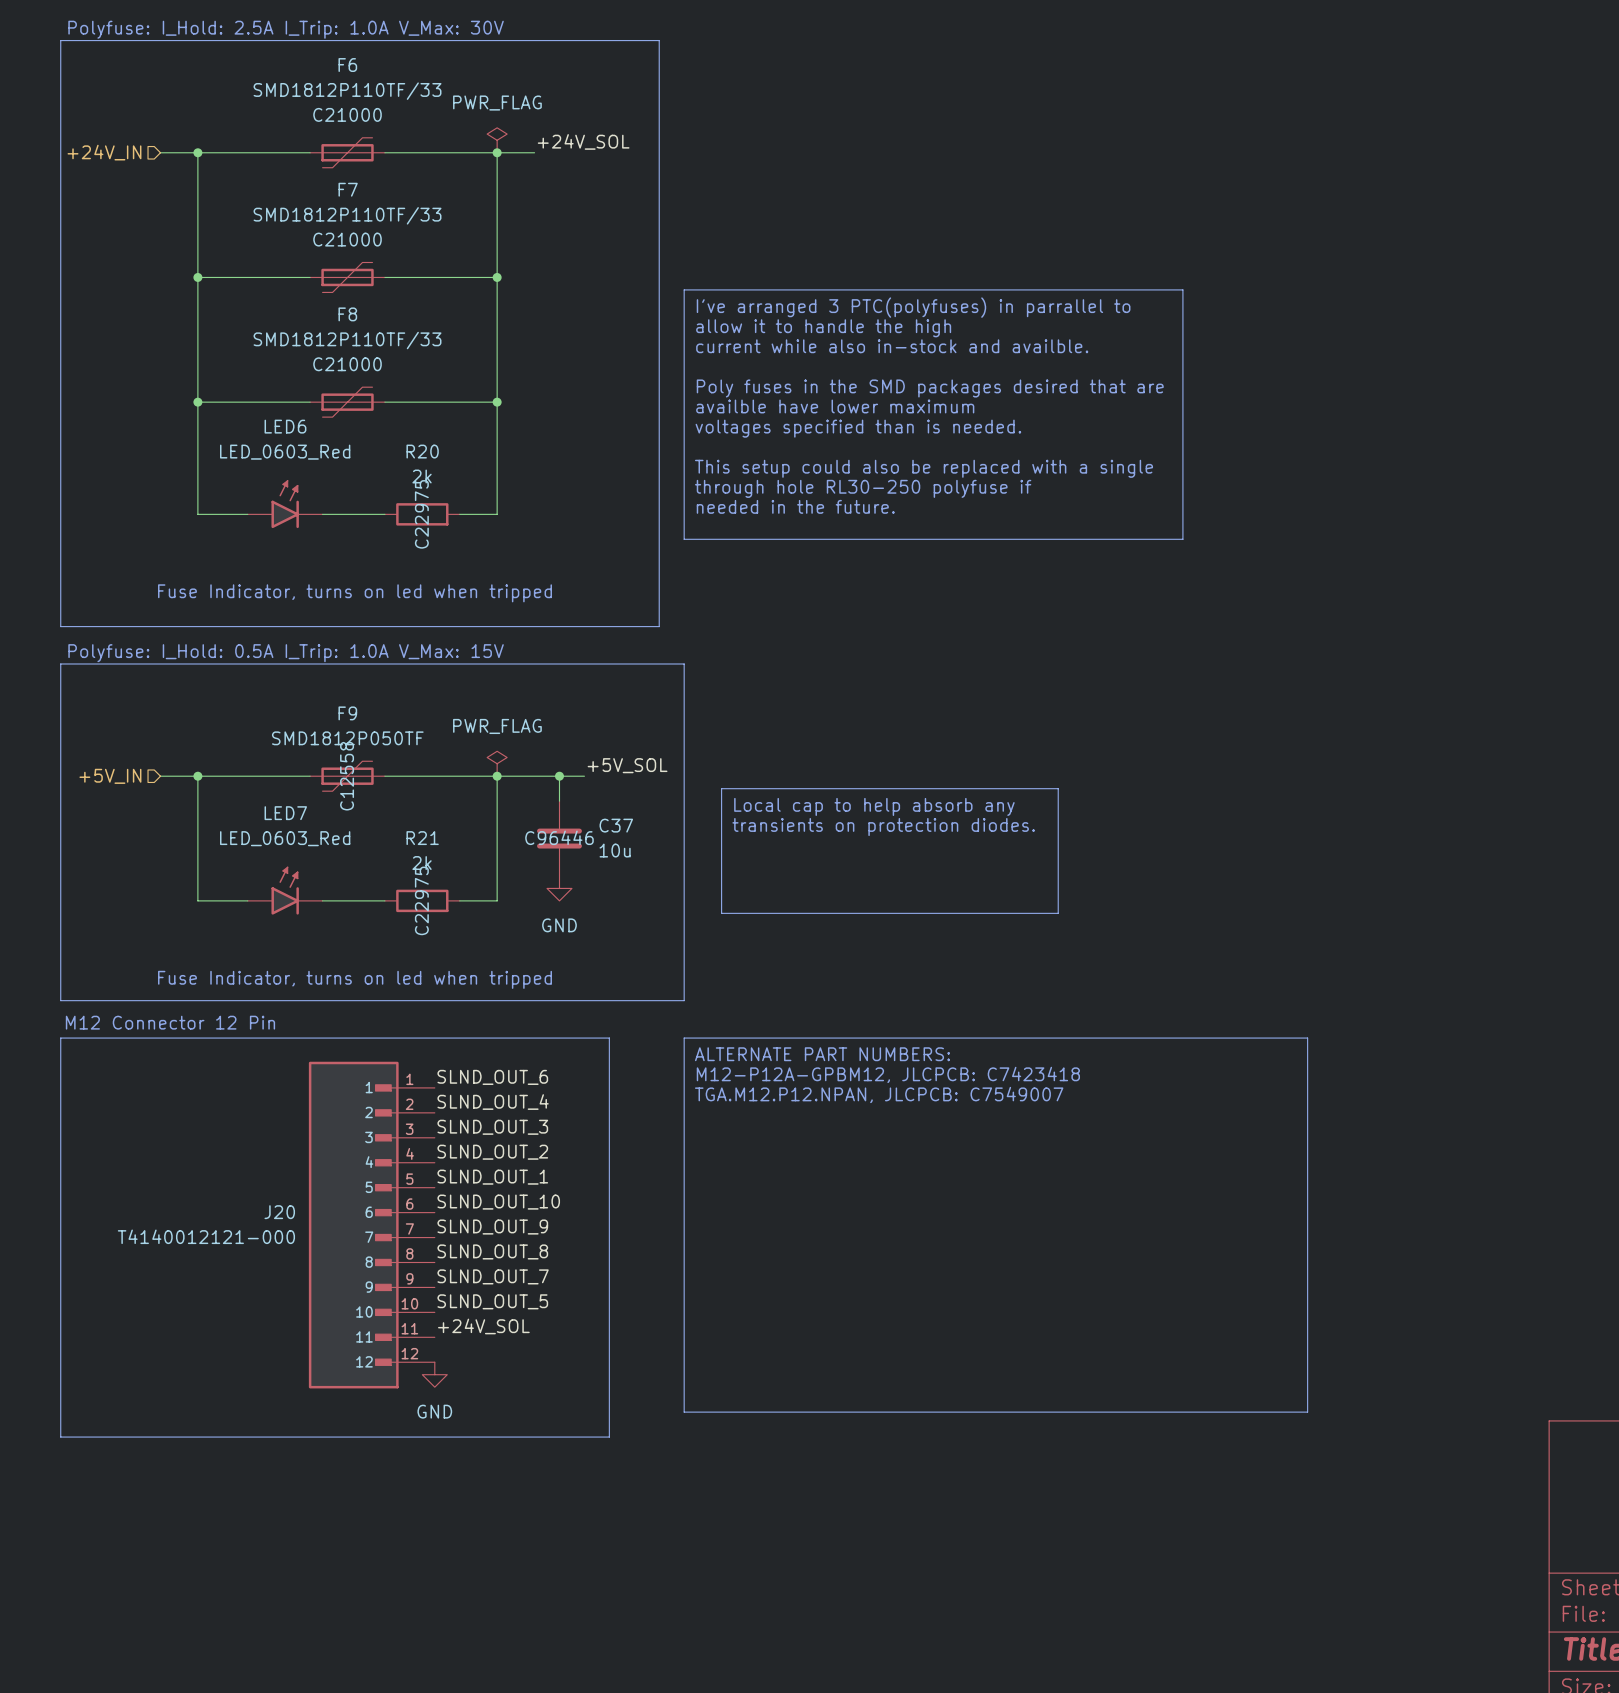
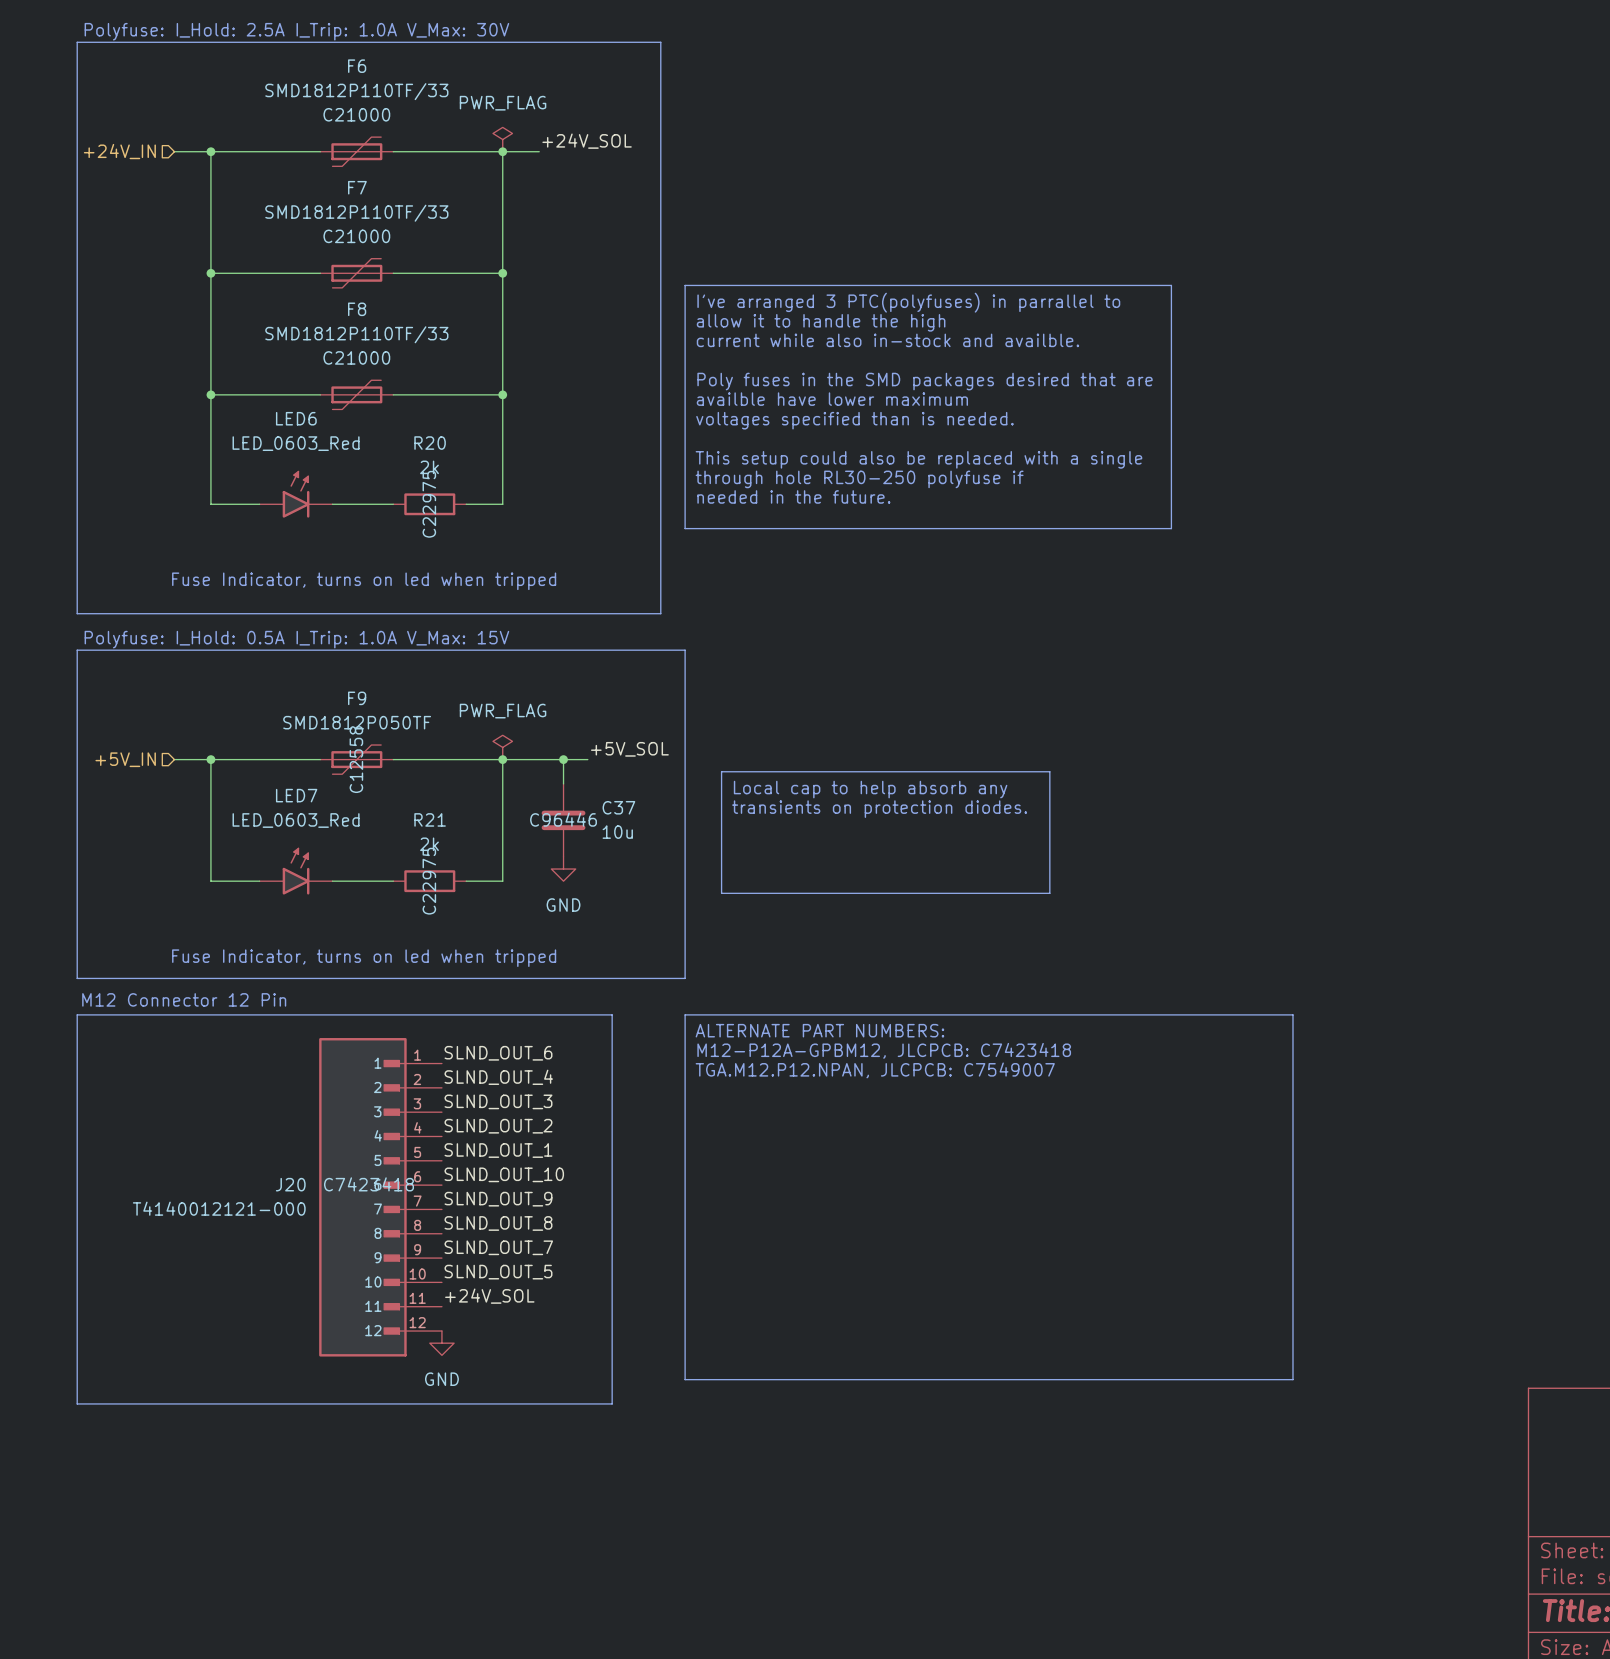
J20 text: none -> C7423418 (369, 1184)

